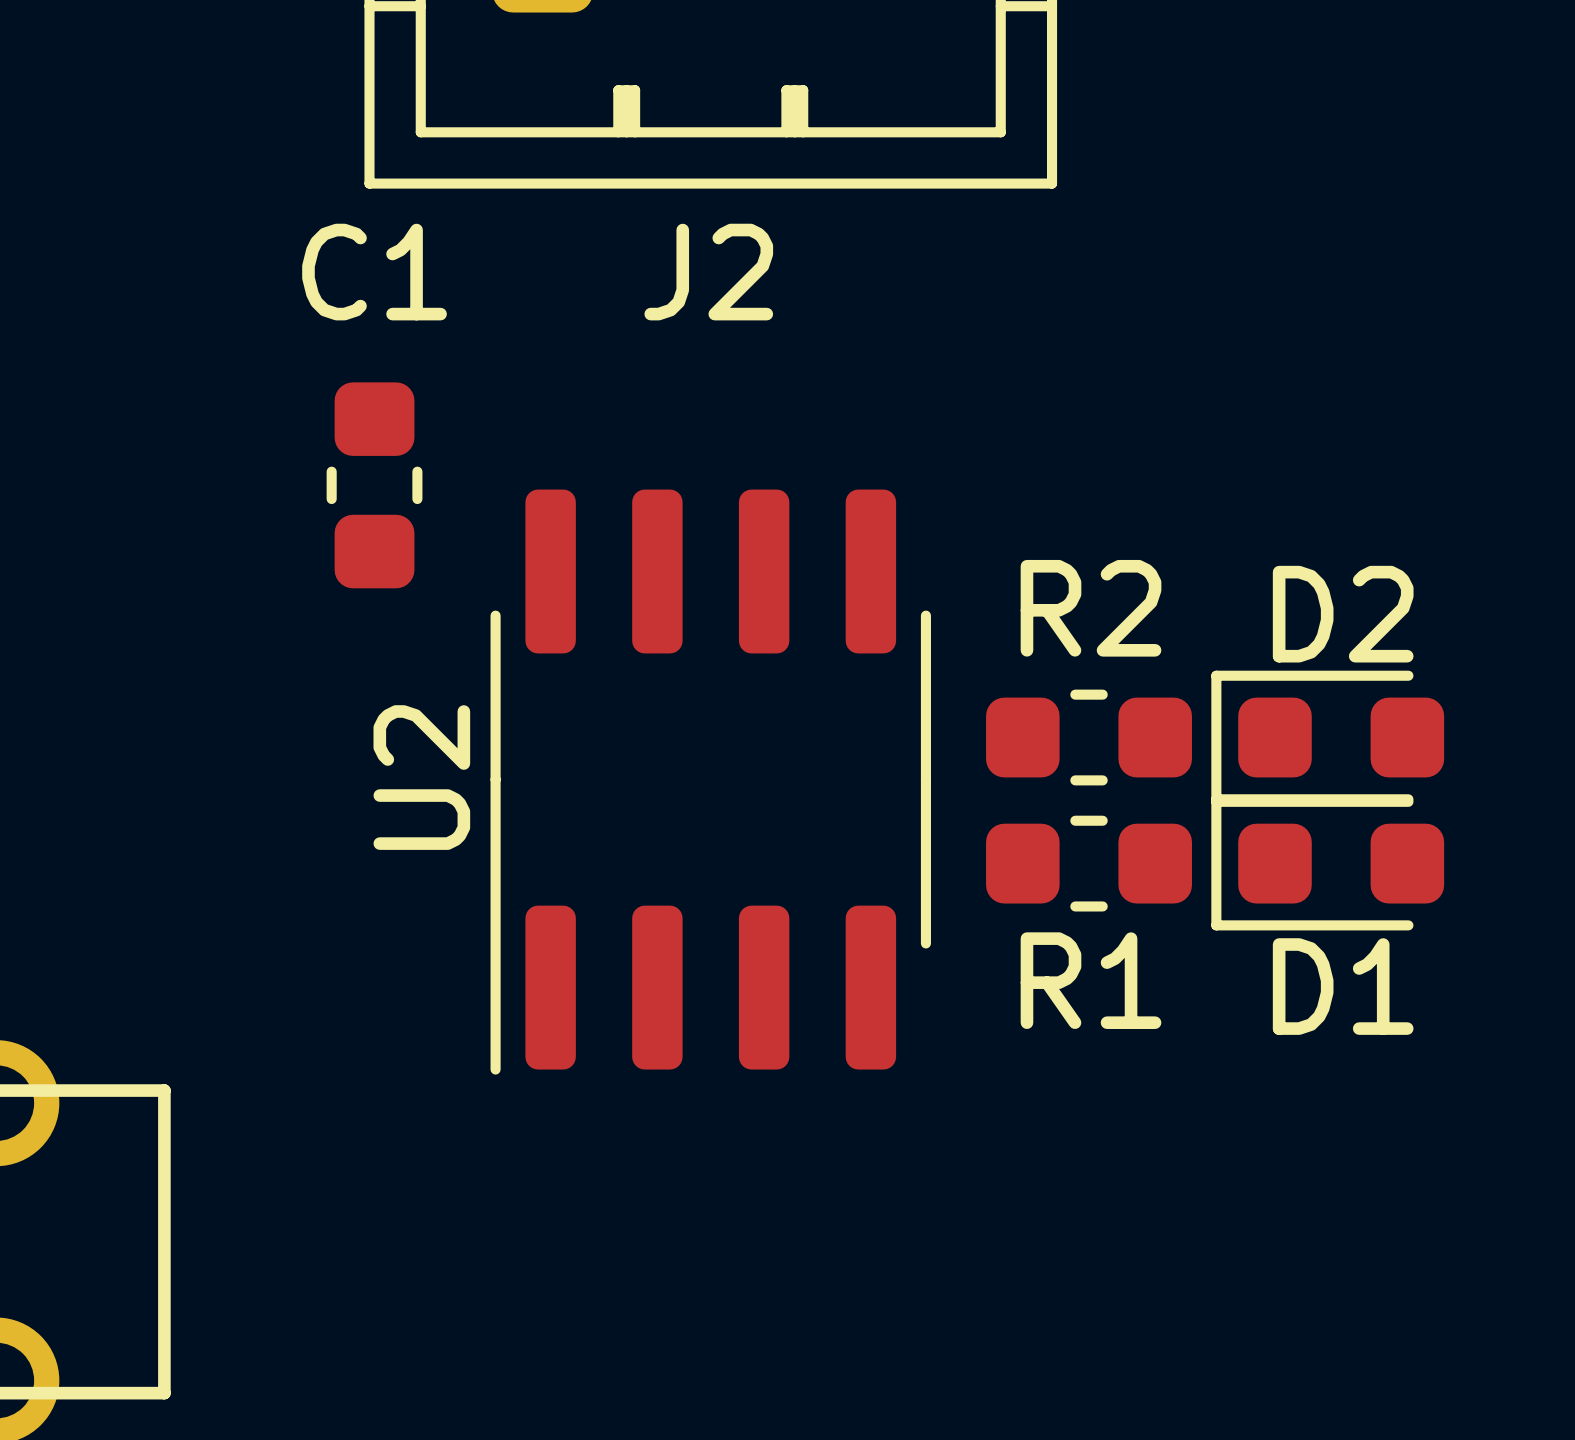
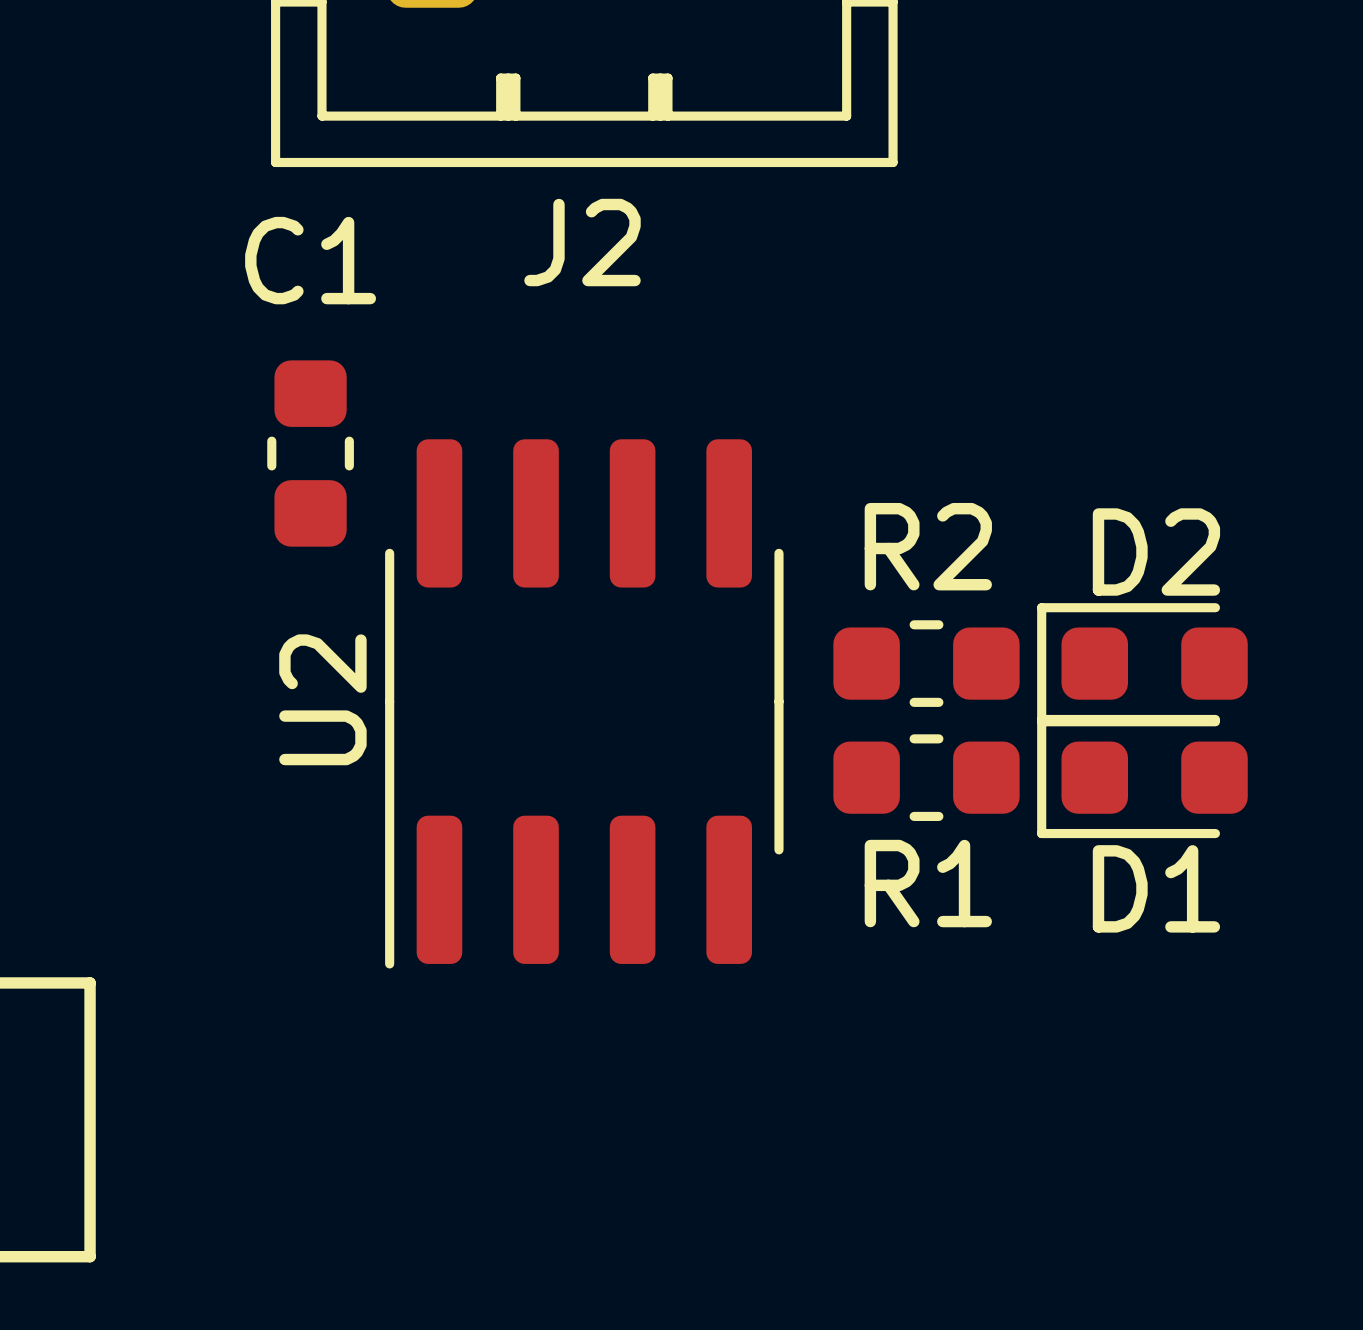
C1 position: (374, 485) -> (310, 453)

